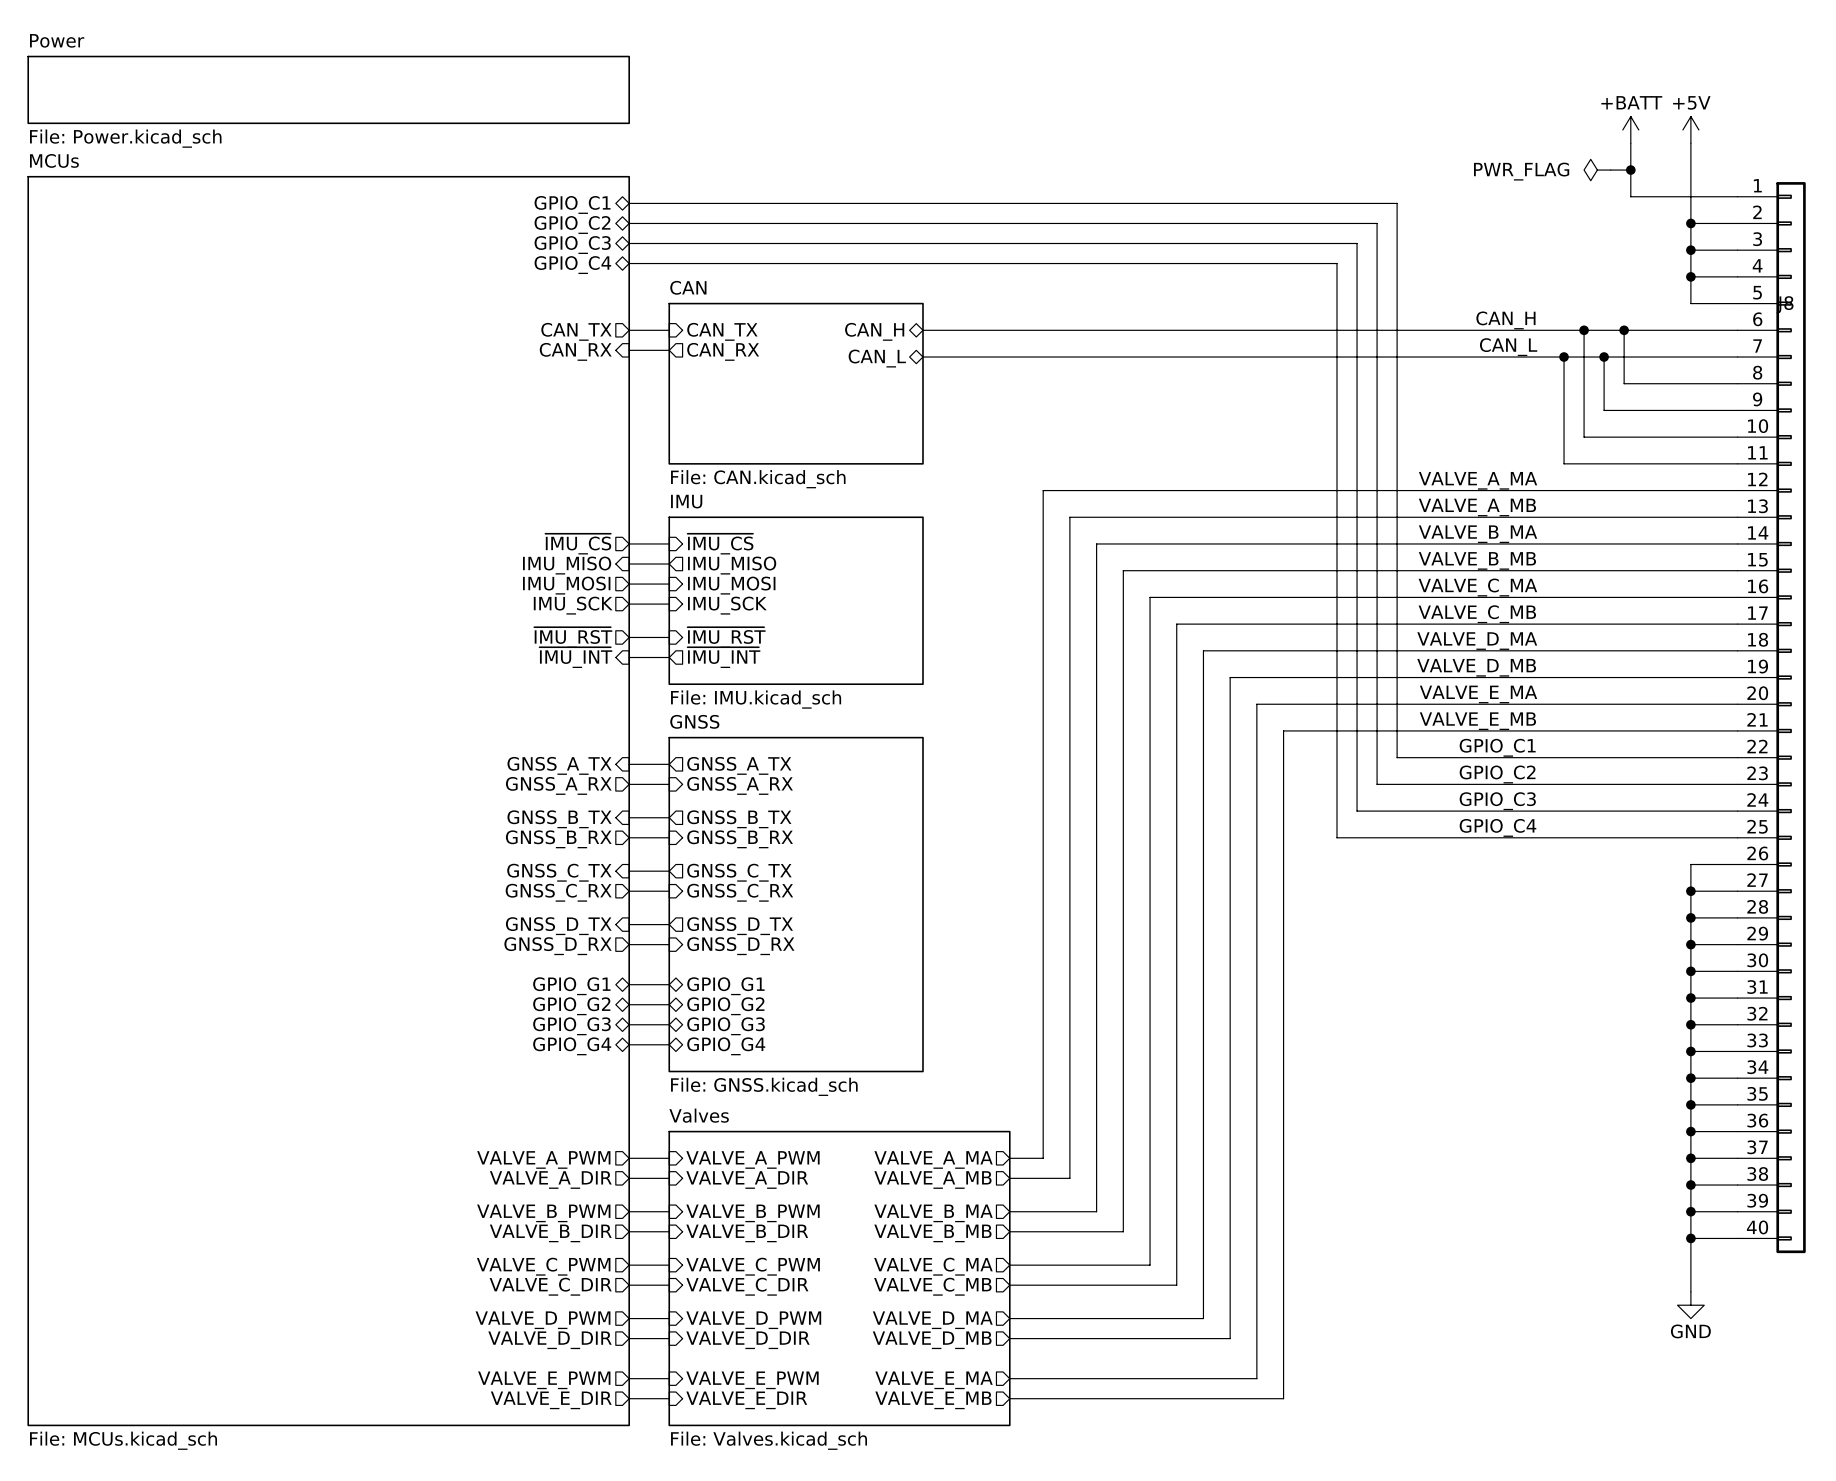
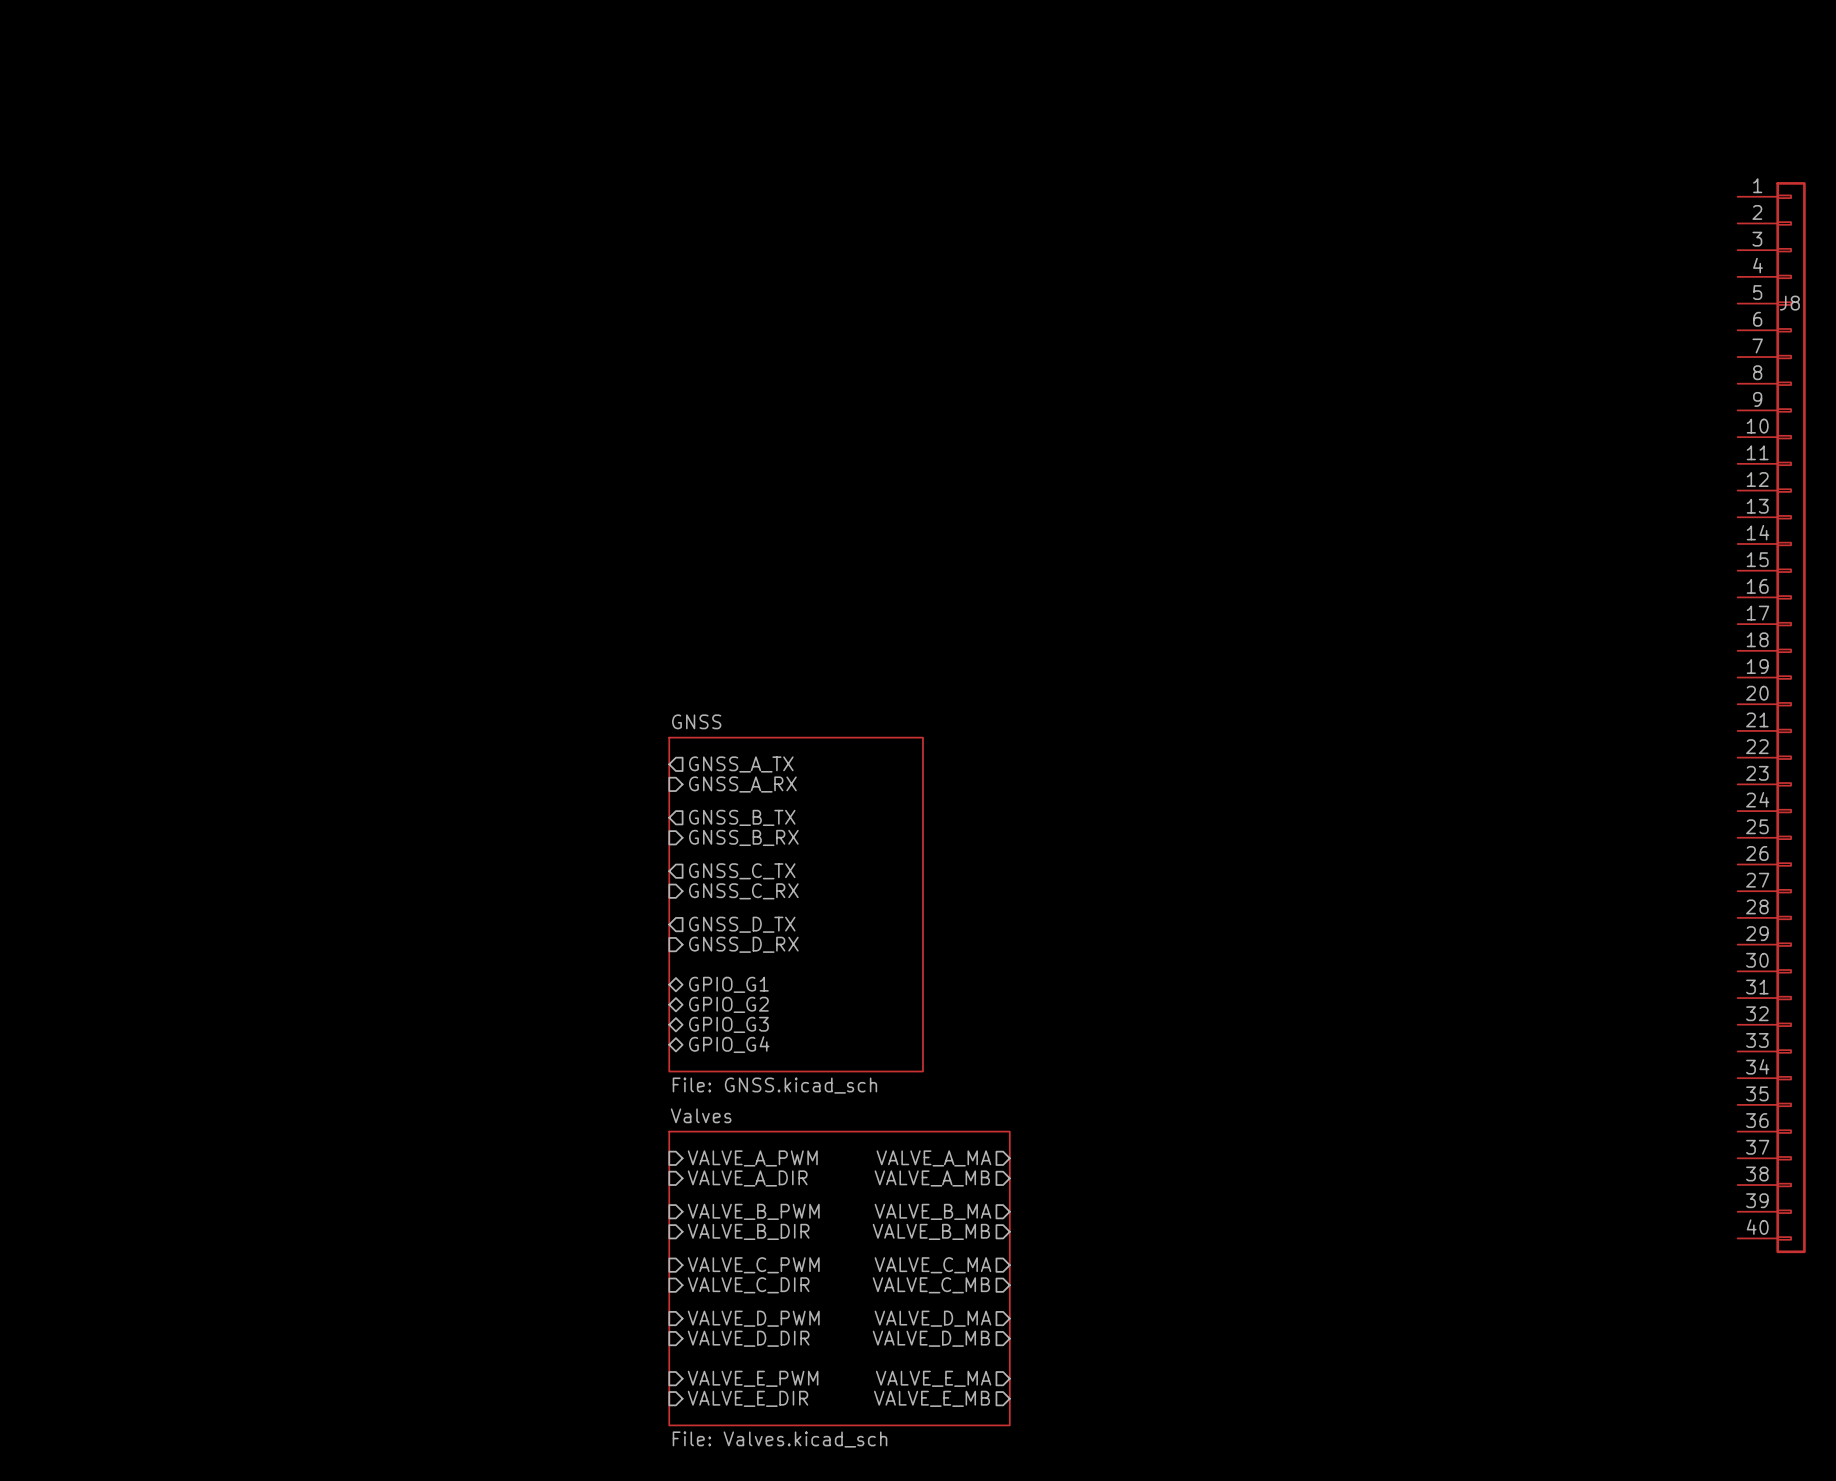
sheet Power: File: Power.kicad_sch (328, 89) -> none
power symbol: +BATT (1630, 129) -> none
power symbol: +5V (1690, 129) -> none
wire: (1630, 143) (1630, 196) (1737, 196) -> none
wire: (1690, 143) (1690, 303) (1737, 303) -> none
power symbol: PWR_FLAG (1597, 170) -> none
wire: (1610, 170) (1630, 170) -> none
junction: (1630, 170) -> none
wire: (629, 203) (1397, 203) (1397, 757) (1737, 757) -> none
sheet pin: GPIO_C1 (572, 204) -> none
wire: (629, 223) (1377, 223) (1377, 784) (1737, 784) -> none
wire: (1690, 223) (1737, 223) -> none
junction: (1690, 223) -> none
sheet pin: GPIO_C2 (572, 225) -> none
wire: (629, 243) (1357, 243) (1357, 811) (1737, 811) -> none
sheet pin: GPIO_C3 (572, 245) -> none
wire: (1690, 250) (1737, 250) -> none
junction: (1690, 250) -> none
wire: (629, 263) (1336, 263) (1336, 837) (1737, 837) -> none
sheet pin: GPIO_C4 (572, 265) -> none
wire: (1690, 276) (1737, 276) -> none
junction: (1690, 276) -> none
label: CAN_H (1505, 320) -> none
wire: (629, 330) (669, 330) -> none
wire: (922, 330) (1737, 330) -> none
wire: (1584, 330) (1584, 437) (1737, 437) -> none
junction: (1584, 330) -> none
wire: (1624, 330) (1624, 383) (1737, 383) -> none
junction: (1624, 330) -> none
sheet pin: CAN_TX (576, 331) -> none
sheet pin: CAN_TX (722, 331) -> none
sheet pin: CAN_H (874, 331) -> none
label: CAN_L (1508, 347) -> none
wire: (629, 350) (669, 350) -> none
sheet pin: CAN_RX (575, 351) -> none
sheet pin: CAN_RX (723, 351) -> none
wire: (922, 357) (1737, 357) -> none
wire: (1564, 357) (1564, 463) (1737, 463) -> none
junction: (1564, 357) -> none
wire: (1604, 357) (1604, 410) (1737, 410) -> none
junction: (1604, 357) -> none
sheet pin: CAN_L (877, 358) -> none
sheet CAN: File: CAN.kicad_sch (796, 383) -> none
label: VALVE_A_MA (1478, 480) -> none
wire: (1737, 490) (1043, 490) (1043, 1158) (1009, 1158) -> none
label: VALVE_A_MB (1477, 507) -> none
wire: (1737, 517) (1069, 517) (1069, 1178) (1009, 1178) -> none
label: VALVE_B_MA (1478, 534) -> none
wire: (629, 543) (669, 543) -> none
wire: (1737, 543) (1096, 543) (1096, 1211) (1009, 1211) -> none
sheet pin: ~{IMU_CS} (578, 544) -> none
sheet pin: ~{IMU_CS} (720, 544) -> none
label: VALVE_B_MB (1477, 560) -> none
wire: (629, 564) (669, 564) -> none
sheet pin: IMU_MISO (567, 565) -> none
sheet pin: IMU_MISO (732, 565) -> none
wire: (1737, 570) (1123, 570) (1123, 1231) (1009, 1231) -> none
wire: (629, 584) (669, 584) -> none
sheet pin: IMU_MOSI (566, 585) -> none
sheet pin: IMU_MOSI (731, 585) -> none
label: VALVE_C_MA (1477, 587) -> none
wire: (1737, 597) (1150, 597) (1150, 1265) (1009, 1265) -> none
sheet IMU: File: IMU.kicad_sch (796, 600) -> none
wire: (629, 604) (669, 604) -> none
sheet pin: IMU_SCK (573, 605) -> none
sheet pin: IMU_SCK (727, 605) -> none
label: VALVE_C_MB (1477, 614) -> none
wire: (1737, 624) (1176, 624) (1176, 1285) (1009, 1285) -> none
sheet pin: ~{IMU_RST} (573, 637) -> none
wire: (629, 637) (669, 637) -> none
sheet pin: ~{IMU_RST} (726, 637) -> none
label: VALVE_D_MA (1477, 641) -> none
wire: (1737, 650) (1203, 650) (1203, 1318) (1009, 1318) -> none
sheet pin: ~{IMU_INT} (575, 657) -> none
wire: (629, 657) (669, 657) -> none
sheet pin: ~{IMU_INT} (723, 657) -> none
label: VALVE_D_MB (1476, 667) -> none
wire: (1737, 677) (1230, 677) (1230, 1338) (1009, 1338) -> none
label: VALVE_E_MA (1478, 694) -> none
wire: (1737, 704) (1256, 704) (1256, 1378) (1009, 1378) -> none
label: VALVE_E_MB (1477, 721) -> none
wire: (1737, 730) (1283, 730) (1283, 1398) (1009, 1398) -> none
label: GPIO_C1 (1497, 747) -> none
wire: (629, 764) (669, 764) -> none
sheet pin: GNSS_A_TX (559, 765) -> none
label: GPIO_C2 (1497, 774) -> none
wire: (629, 784) (669, 784) -> none
sheet pin: GNSS_A_RX (558, 785) -> none
sheet MCUs: File: MCUs.kicad_sch (328, 801) -> none
label: GPIO_C3 (1497, 801) -> none
wire: (629, 817) (669, 817) -> none
sheet pin: GNSS_B_TX (559, 819) -> none
label: GPIO_C4 (1497, 827) -> none
wire: (629, 837) (669, 837) -> none
sheet pin: GNSS_B_RX (558, 839) -> none
wire: (1737, 864) (1690, 864) (1690, 1291) -> none
wire: (629, 871) (669, 871) -> none
sheet pin: GNSS_C_TX (559, 872) -> none
wire: (629, 891) (669, 891) -> none
wire: (1690, 891) (1737, 891) -> none
junction: (1690, 891) -> none
sheet pin: GNSS_C_RX (558, 892) -> none
wire: (1690, 917) (1737, 917) -> none
junction: (1690, 917) -> none
wire: (629, 924) (669, 924) -> none
sheet pin: GNSS_D_TX (558, 926) -> none
wire: (629, 944) (669, 944) -> none
wire: (1690, 944) (1737, 944) -> none
junction: (1690, 944) -> none
sheet pin: GNSS_D_RX (558, 946) -> none
wire: (1690, 971) (1737, 971) -> none
junction: (1690, 971) -> none
wire: (629, 984) (669, 984) -> none
sheet pin: GPIO_G1 (571, 986) -> none
wire: (1690, 998) (1737, 998) -> none
junction: (1690, 998) -> none
wire: (629, 1004) (669, 1004) -> none
sheet pin: GPIO_G2 (571, 1006) -> none
wire: (629, 1024) (669, 1024) -> none
wire: (1690, 1024) (1737, 1024) -> none
junction: (1690, 1024) -> none
sheet pin: GPIO_G3 (571, 1026) -> none
wire: (629, 1044) (669, 1044) -> none
sheet pin: GPIO_G4 (572, 1046) -> none
wire: (1690, 1051) (1737, 1051) -> none
junction: (1690, 1051) -> none
wire: (1690, 1078) (1737, 1078) -> none
junction: (1690, 1078) -> none
wire: (1690, 1104) (1737, 1104) -> none
junction: (1690, 1104) -> none
wire: (1690, 1131) (1737, 1131) -> none
junction: (1690, 1131) -> none
wire: (629, 1158) (669, 1158) -> none
wire: (1690, 1158) (1737, 1158) -> none
junction: (1690, 1158) -> none
sheet pin: VALVE_A_PWM (543, 1159) -> none
wire: (629, 1178) (669, 1178) -> none
sheet pin: VALVE_A_DIR (550, 1180) -> none
wire: (1690, 1185) (1737, 1185) -> none
junction: (1690, 1185) -> none
wire: (629, 1211) (669, 1211) -> none
wire: (1690, 1211) (1737, 1211) -> none
junction: (1690, 1211) -> none
sheet pin: VALVE_B_PWM (543, 1213) -> none
wire: (629, 1231) (669, 1231) -> none
sheet pin: VALVE_B_DIR (550, 1233) -> none
wire: (1690, 1238) (1737, 1238) -> none
junction: (1690, 1238) -> none
wire: (629, 1265) (669, 1265) -> none
sheet pin: VALVE_C_PWM (543, 1266) -> none
wire: (629, 1285) (669, 1285) -> none
sheet pin: VALVE_C_DIR (550, 1286) -> none
power symbol: GND (1690, 1305) -> none
wire: (629, 1318) (669, 1318) -> none
sheet pin: VALVE_D_PWM (543, 1320) -> none
wire: (629, 1338) (669, 1338) -> none
sheet pin: VALVE_D_DIR (550, 1340) -> none
wire: (629, 1378) (669, 1378) -> none
sheet pin: VALVE_E_PWM (544, 1380) -> none
wire: (629, 1398) (669, 1398) -> none
sheet pin: VALVE_E_DIR (551, 1400) -> none

